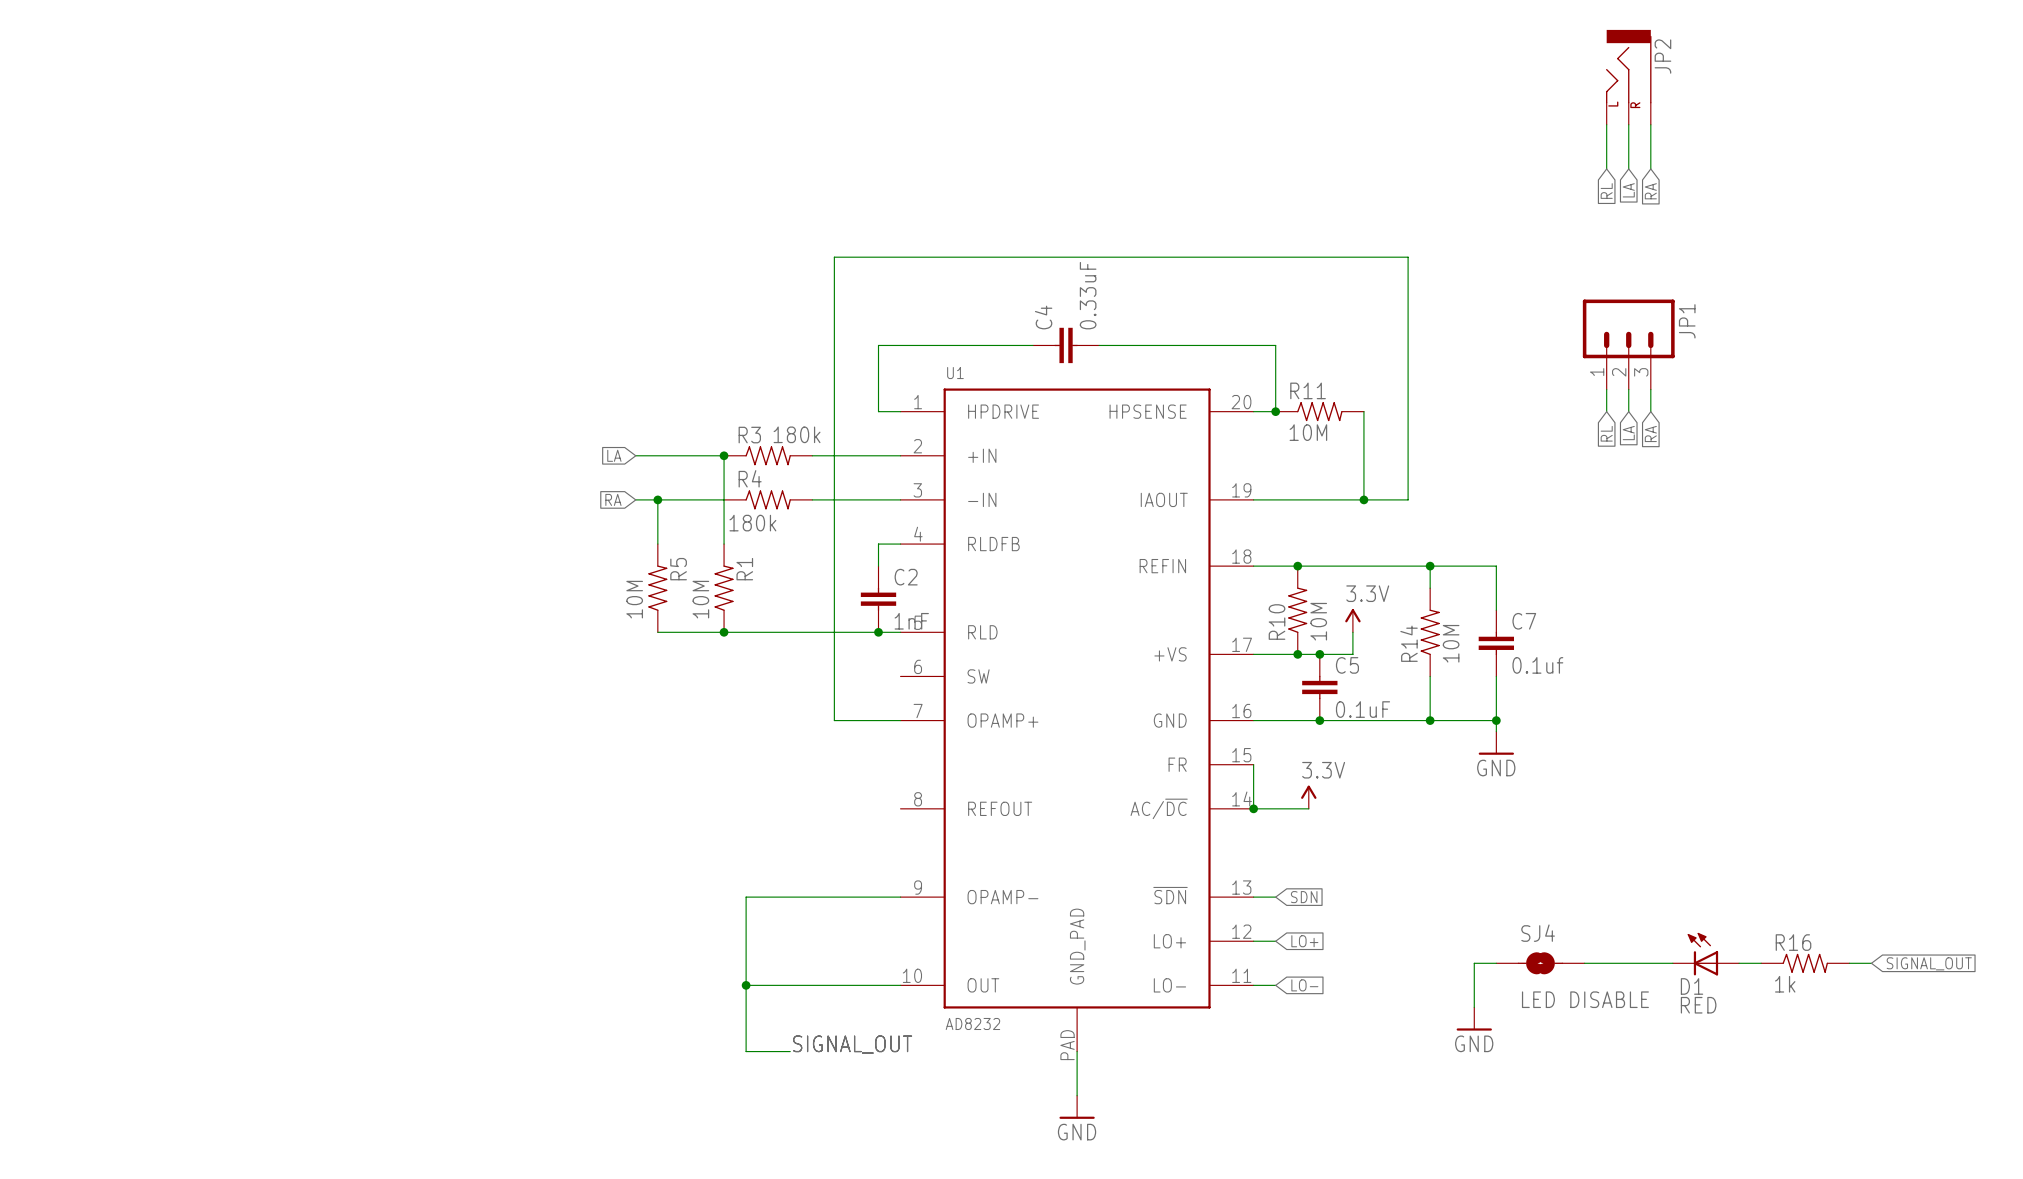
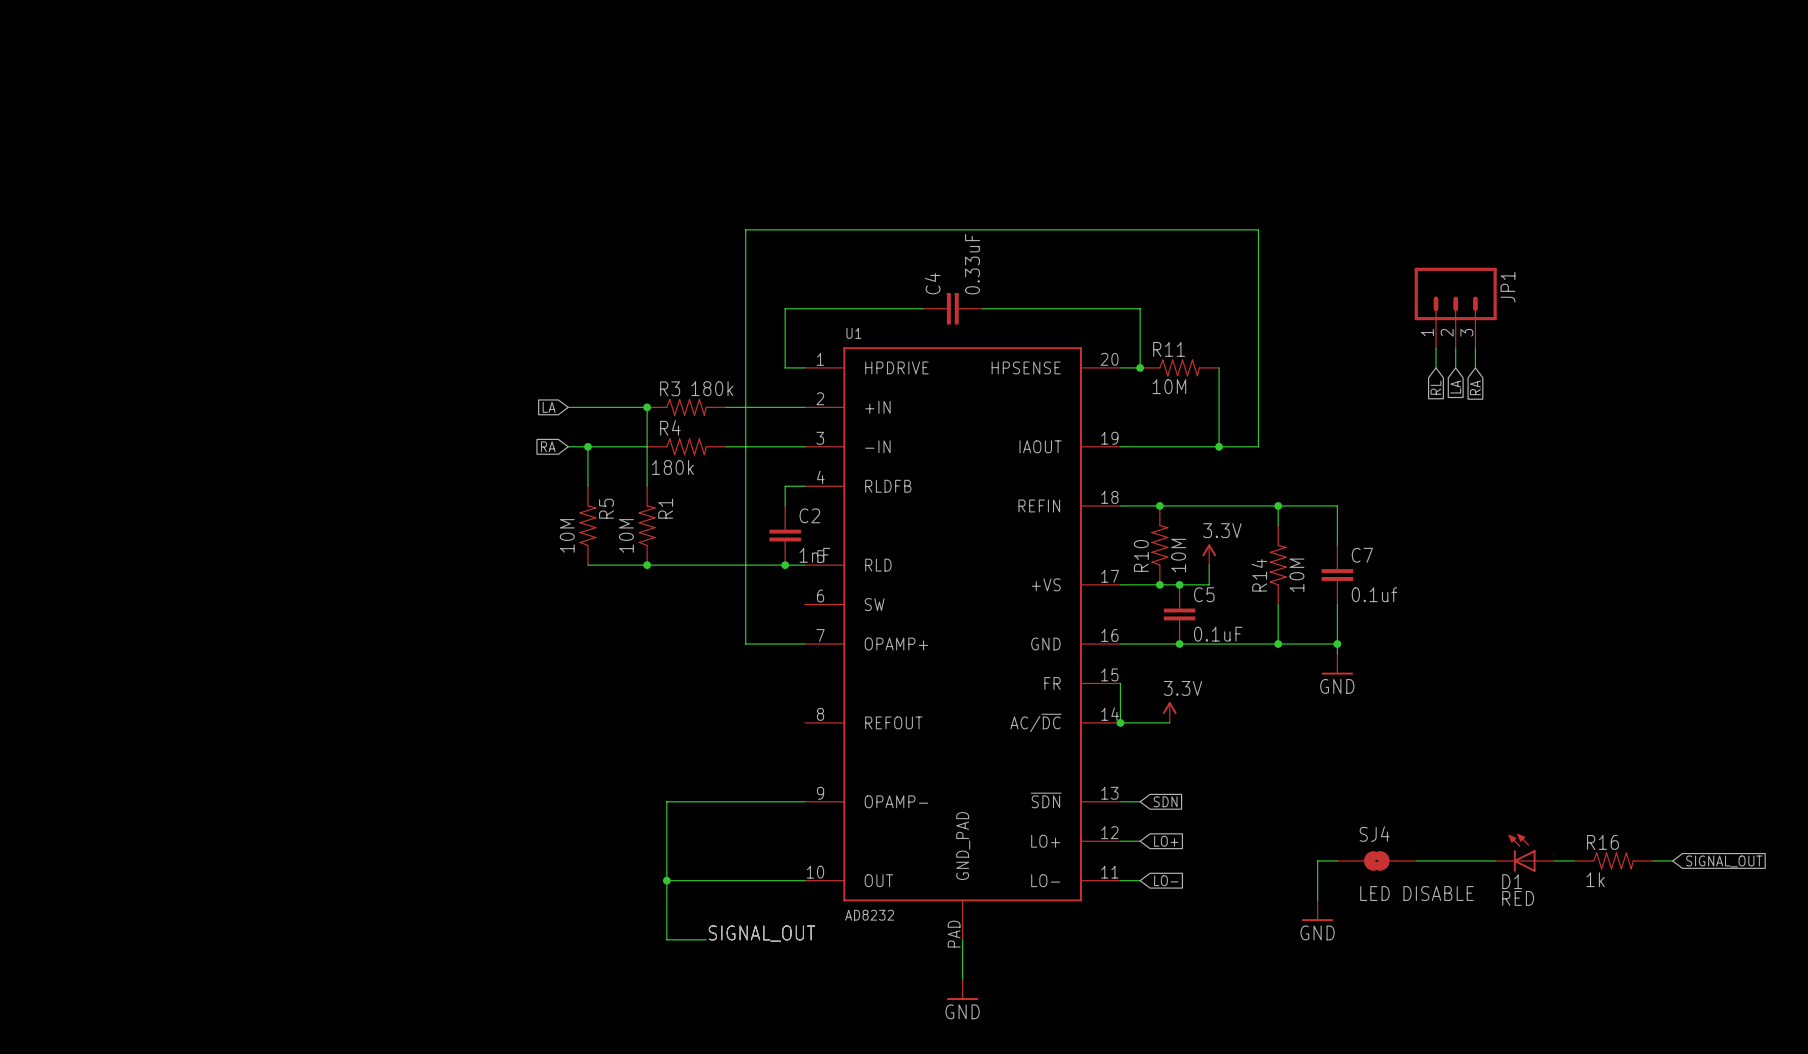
JP2: (1628, 77) -> none
wire: (1606, 124) (1606, 168) -> none
wire: (1628, 124) (1628, 168) -> none
wire: (1650, 124) (1650, 168) -> none
global label: LA (1628, 190) -> none
global label: RL (1606, 191) -> none
global label: RA (1650, 191) -> none

